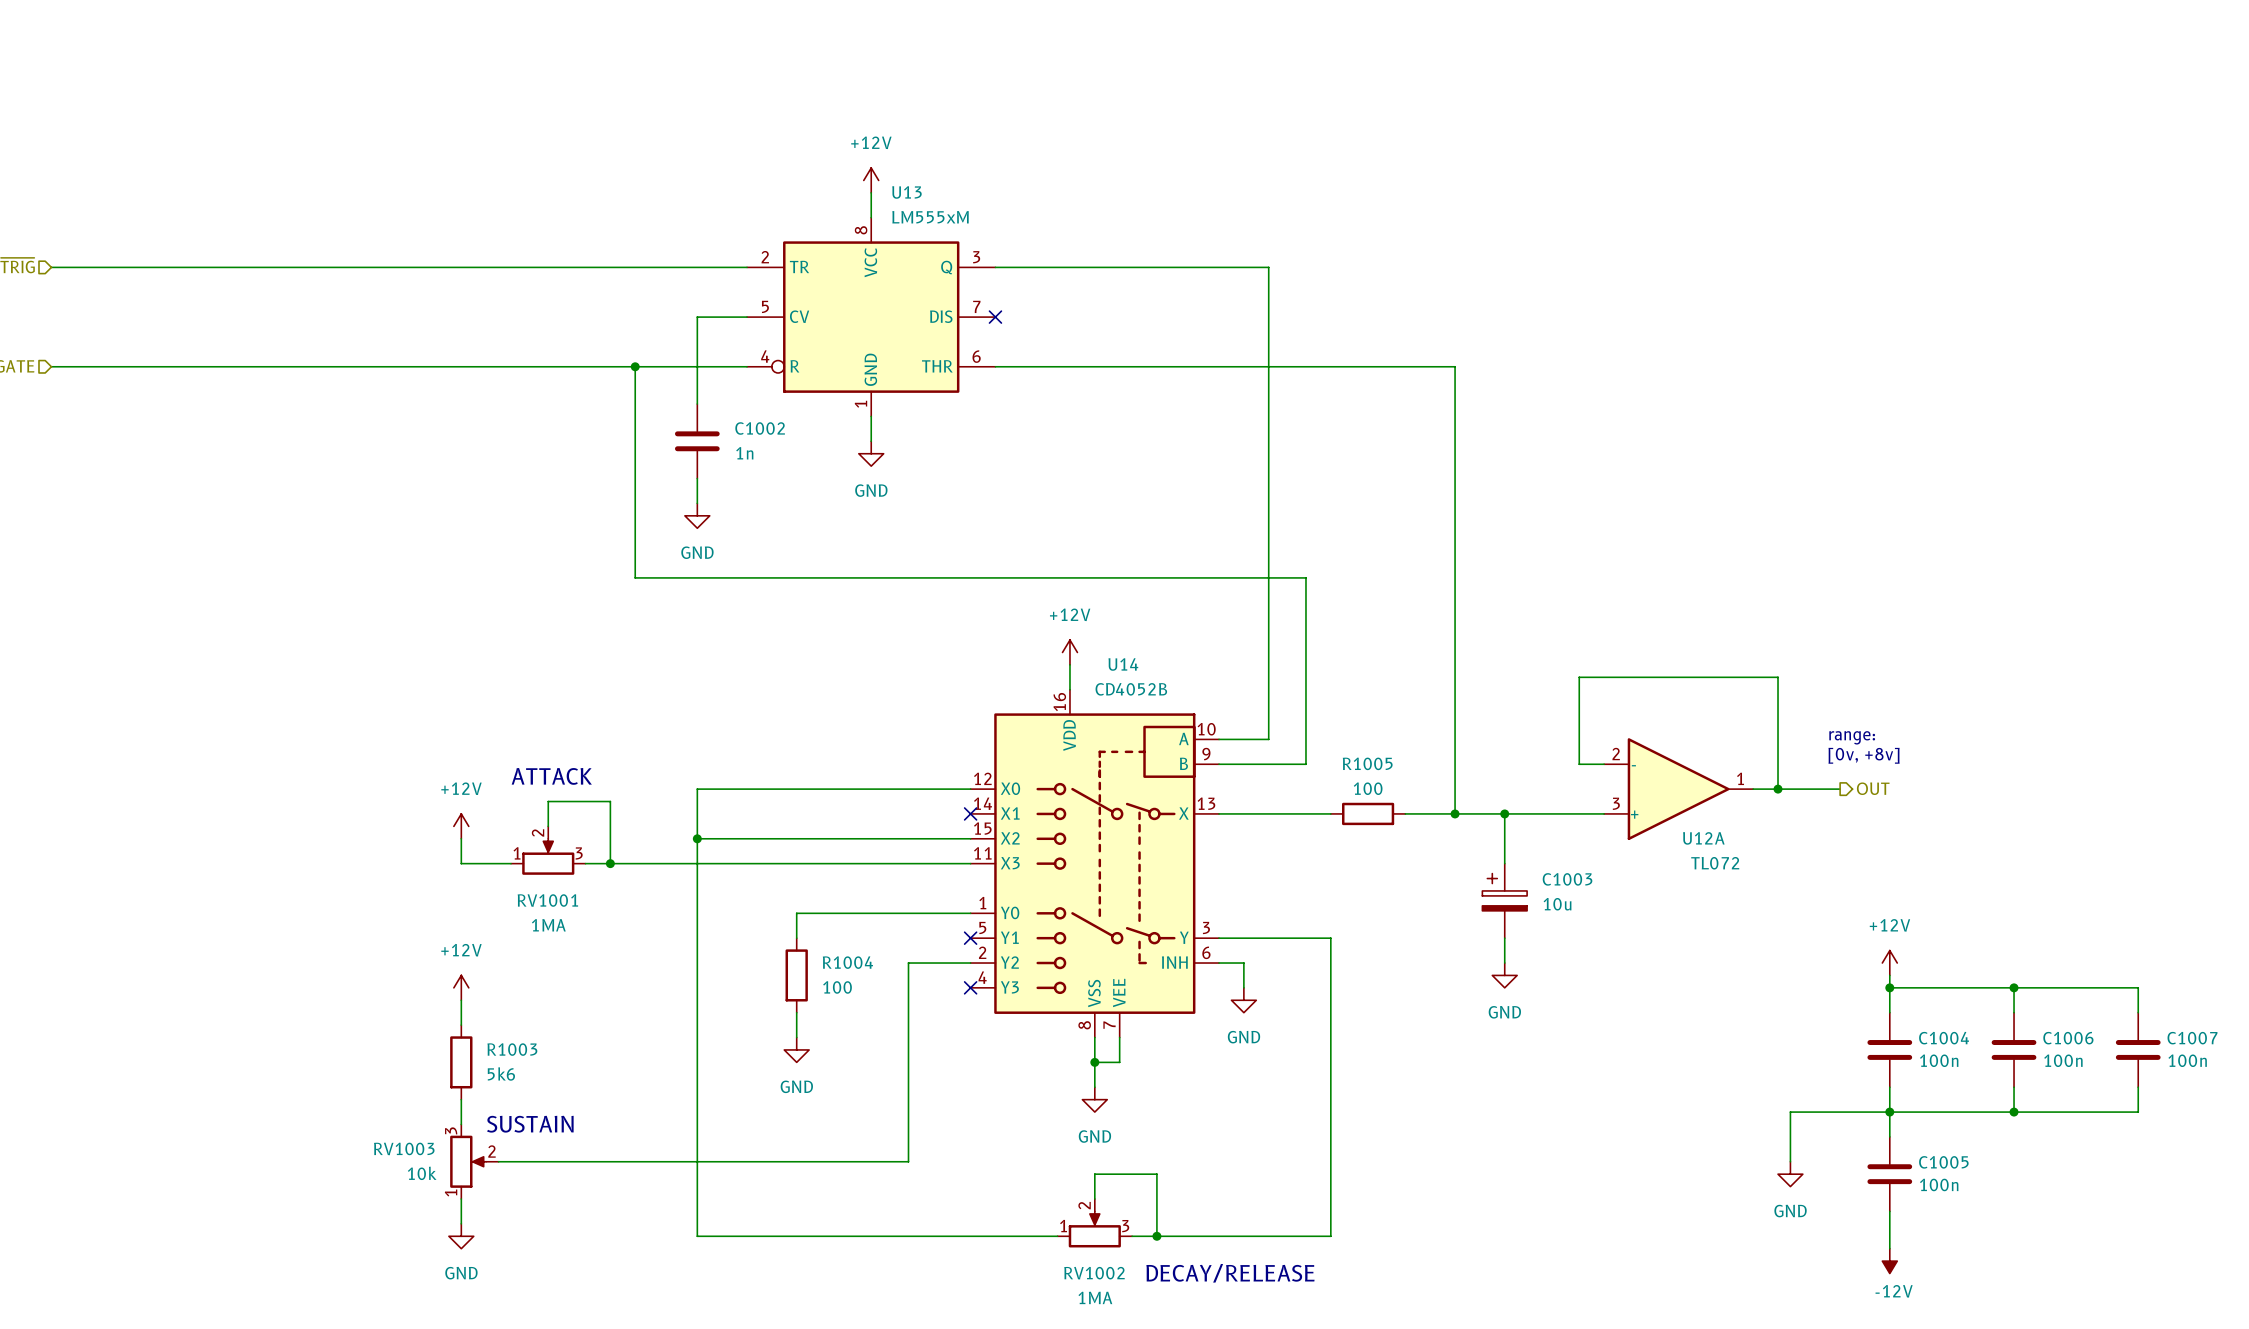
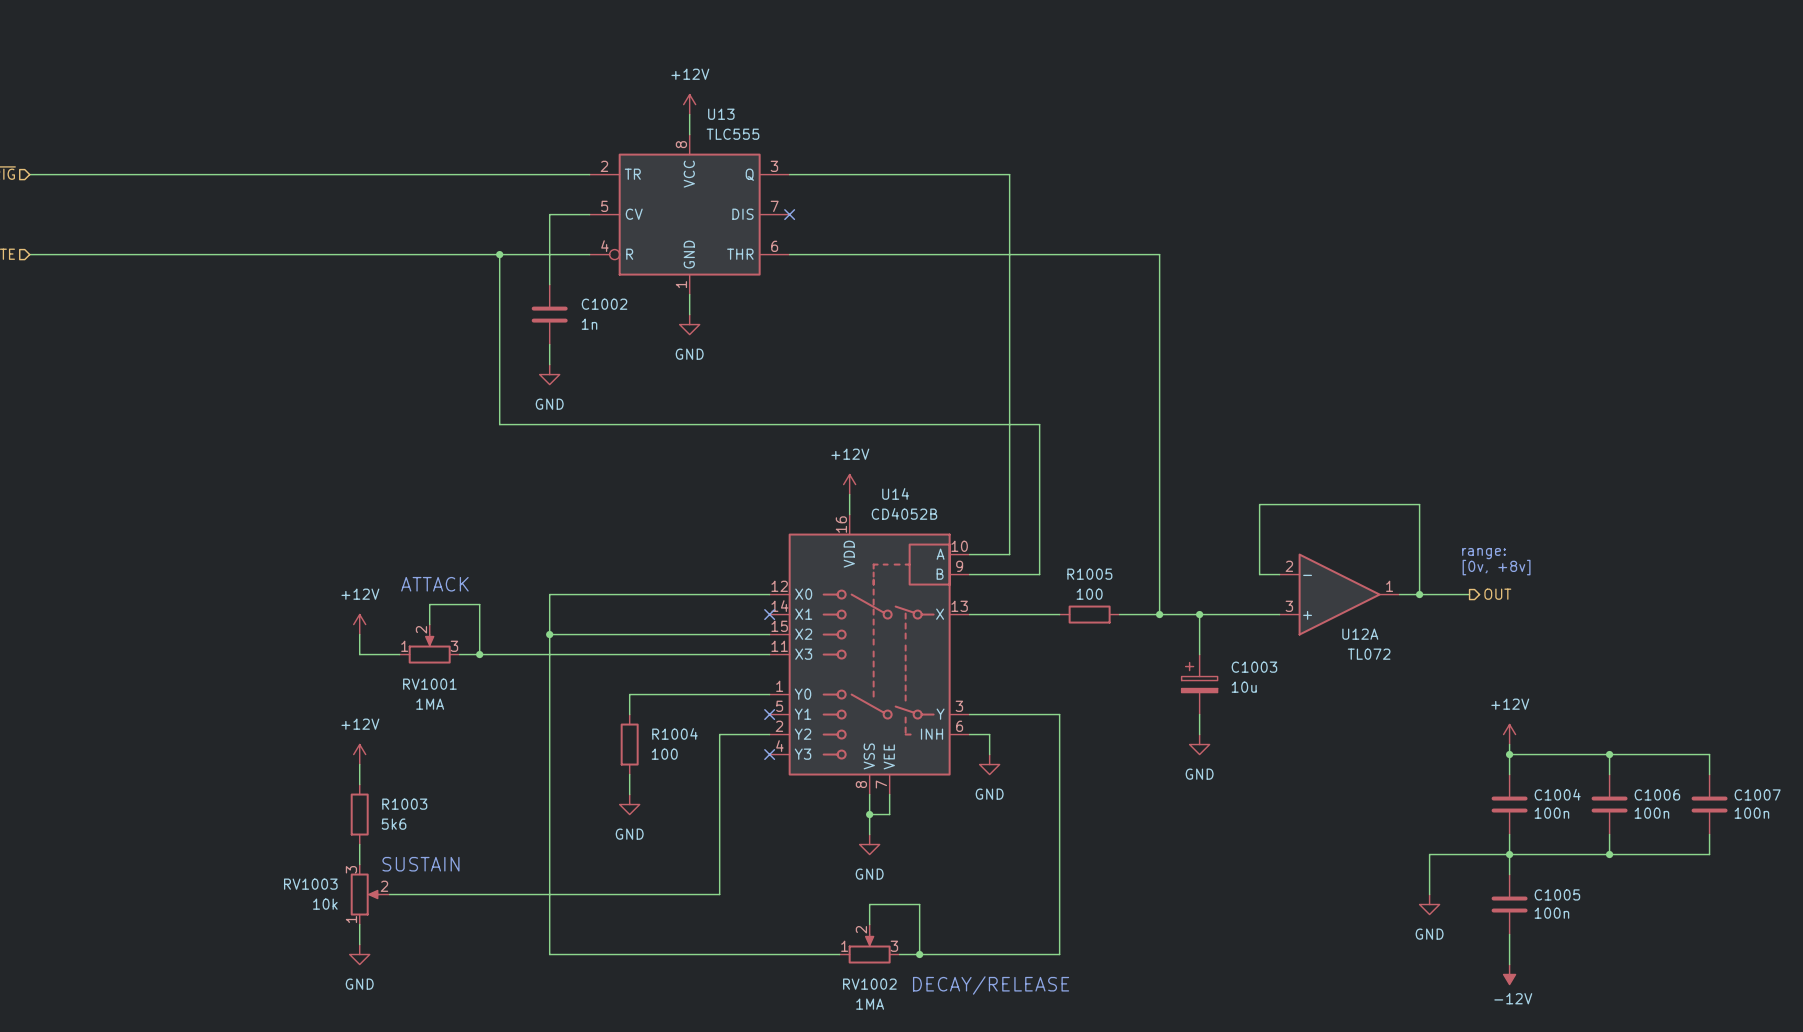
U13 value: LM555xM (930, 217) -> TLC555 (733, 134)

